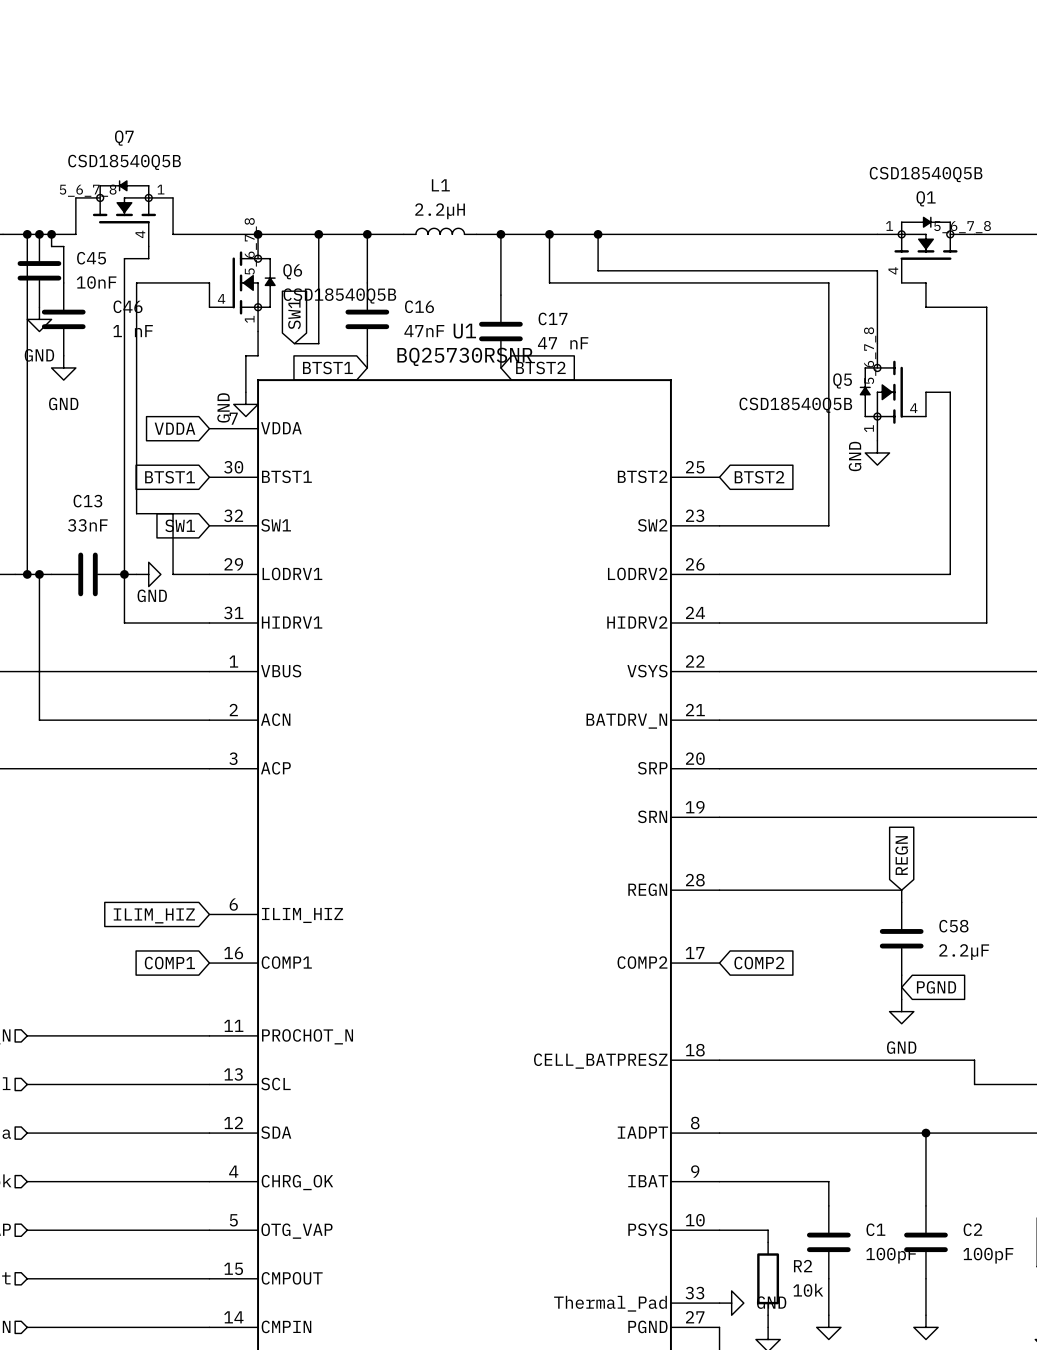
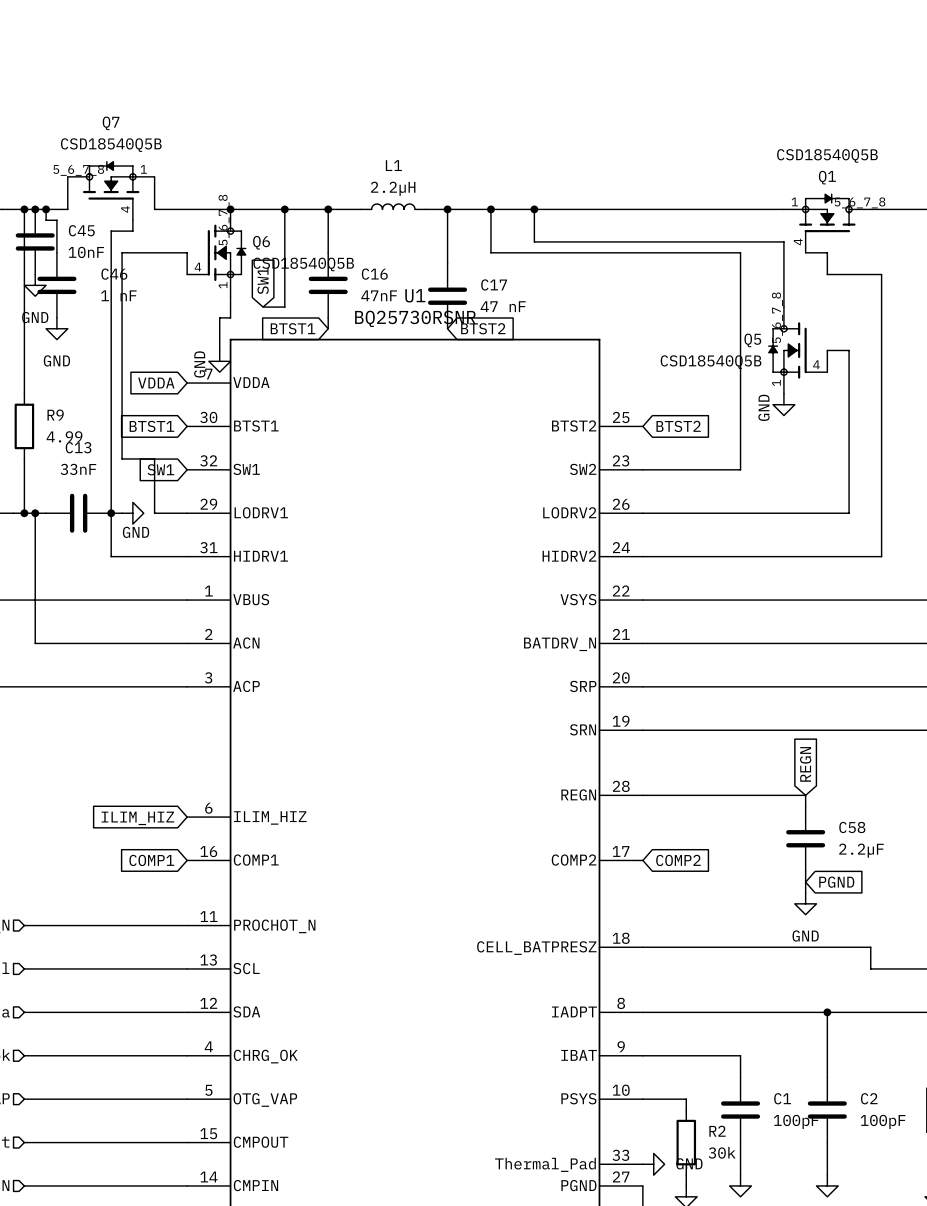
wire: (27, 440) (27, 513) -> none
R9: none -> 4.99 (24, 426)
R2 value: 10k (808, 1290) -> 30k (722, 1152)

